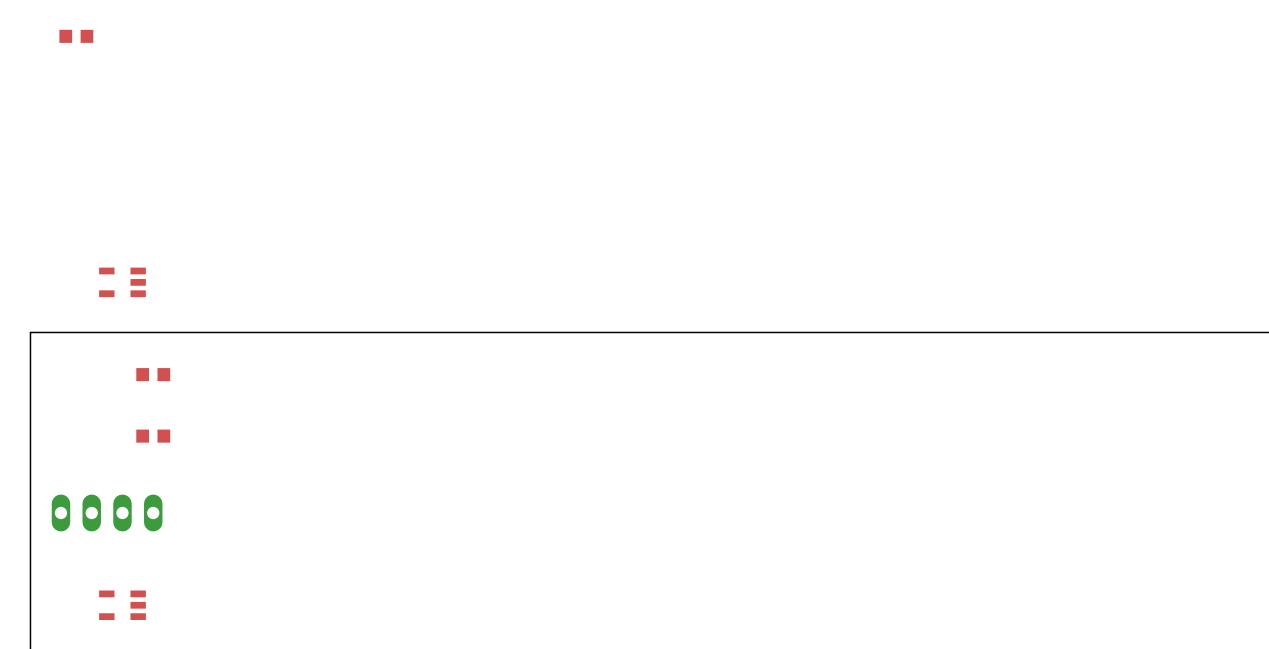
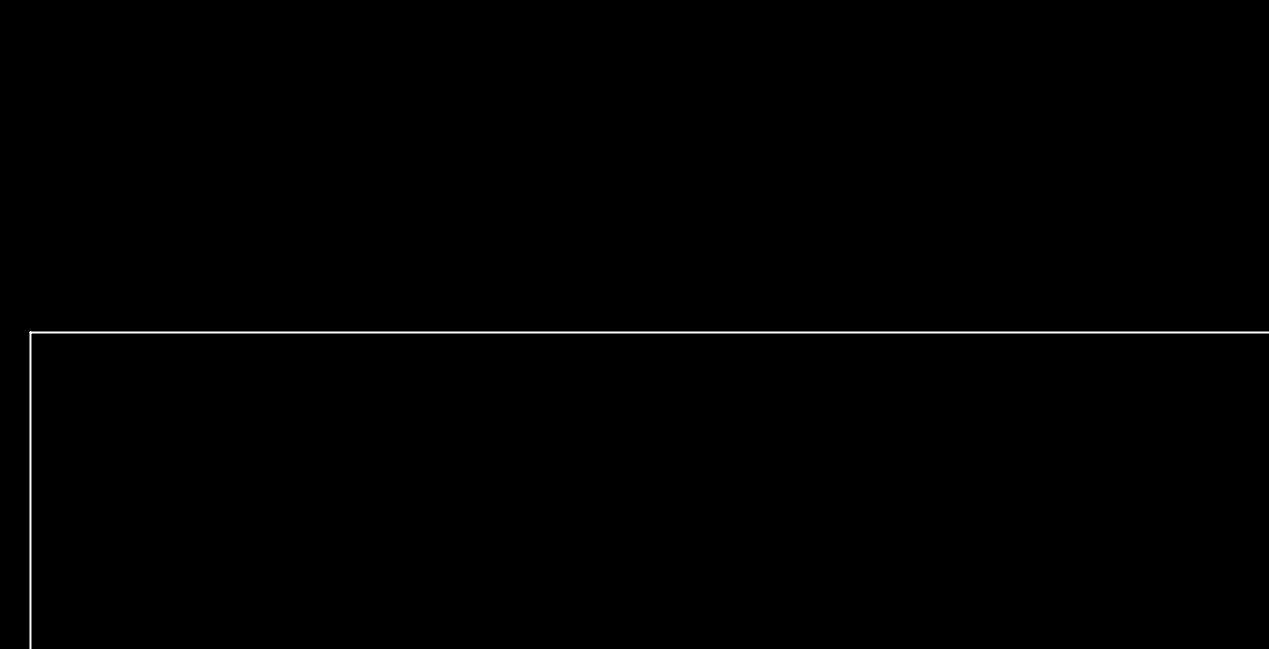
part: (76, 36) -> none
part: (122, 282) -> none
part: (153, 374) -> none
part: (153, 436) -> none
part: (107, 513) -> none
part: (122, 605) -> none

